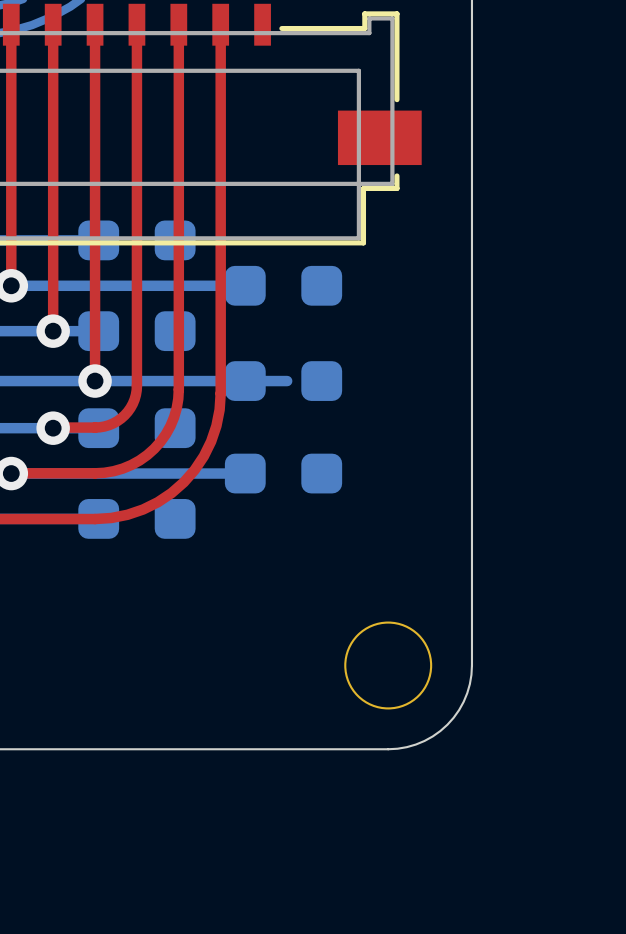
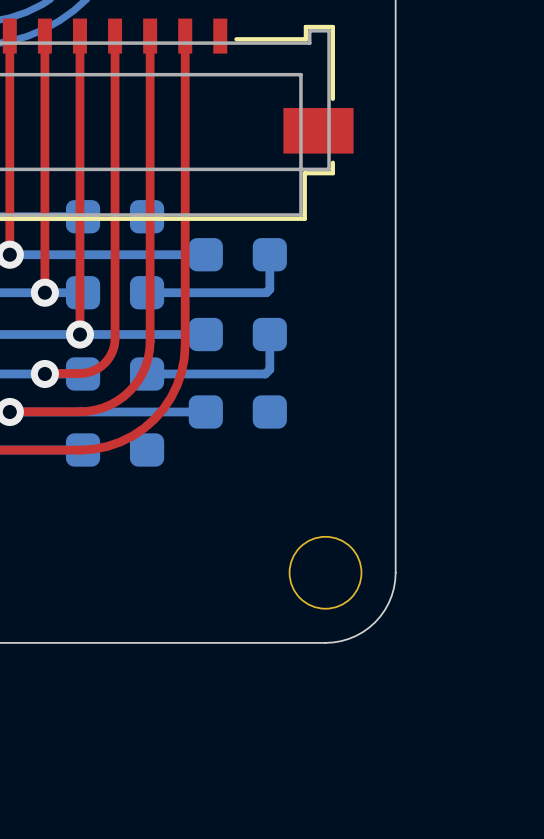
bottom track: none -> (269, 254) (269, 289) (266, 292) (147, 292)
bottom track: (245, 381) (287, 381) -> none
bottom track: none -> (269, 334) (269, 369) (265, 373) (147, 373)

